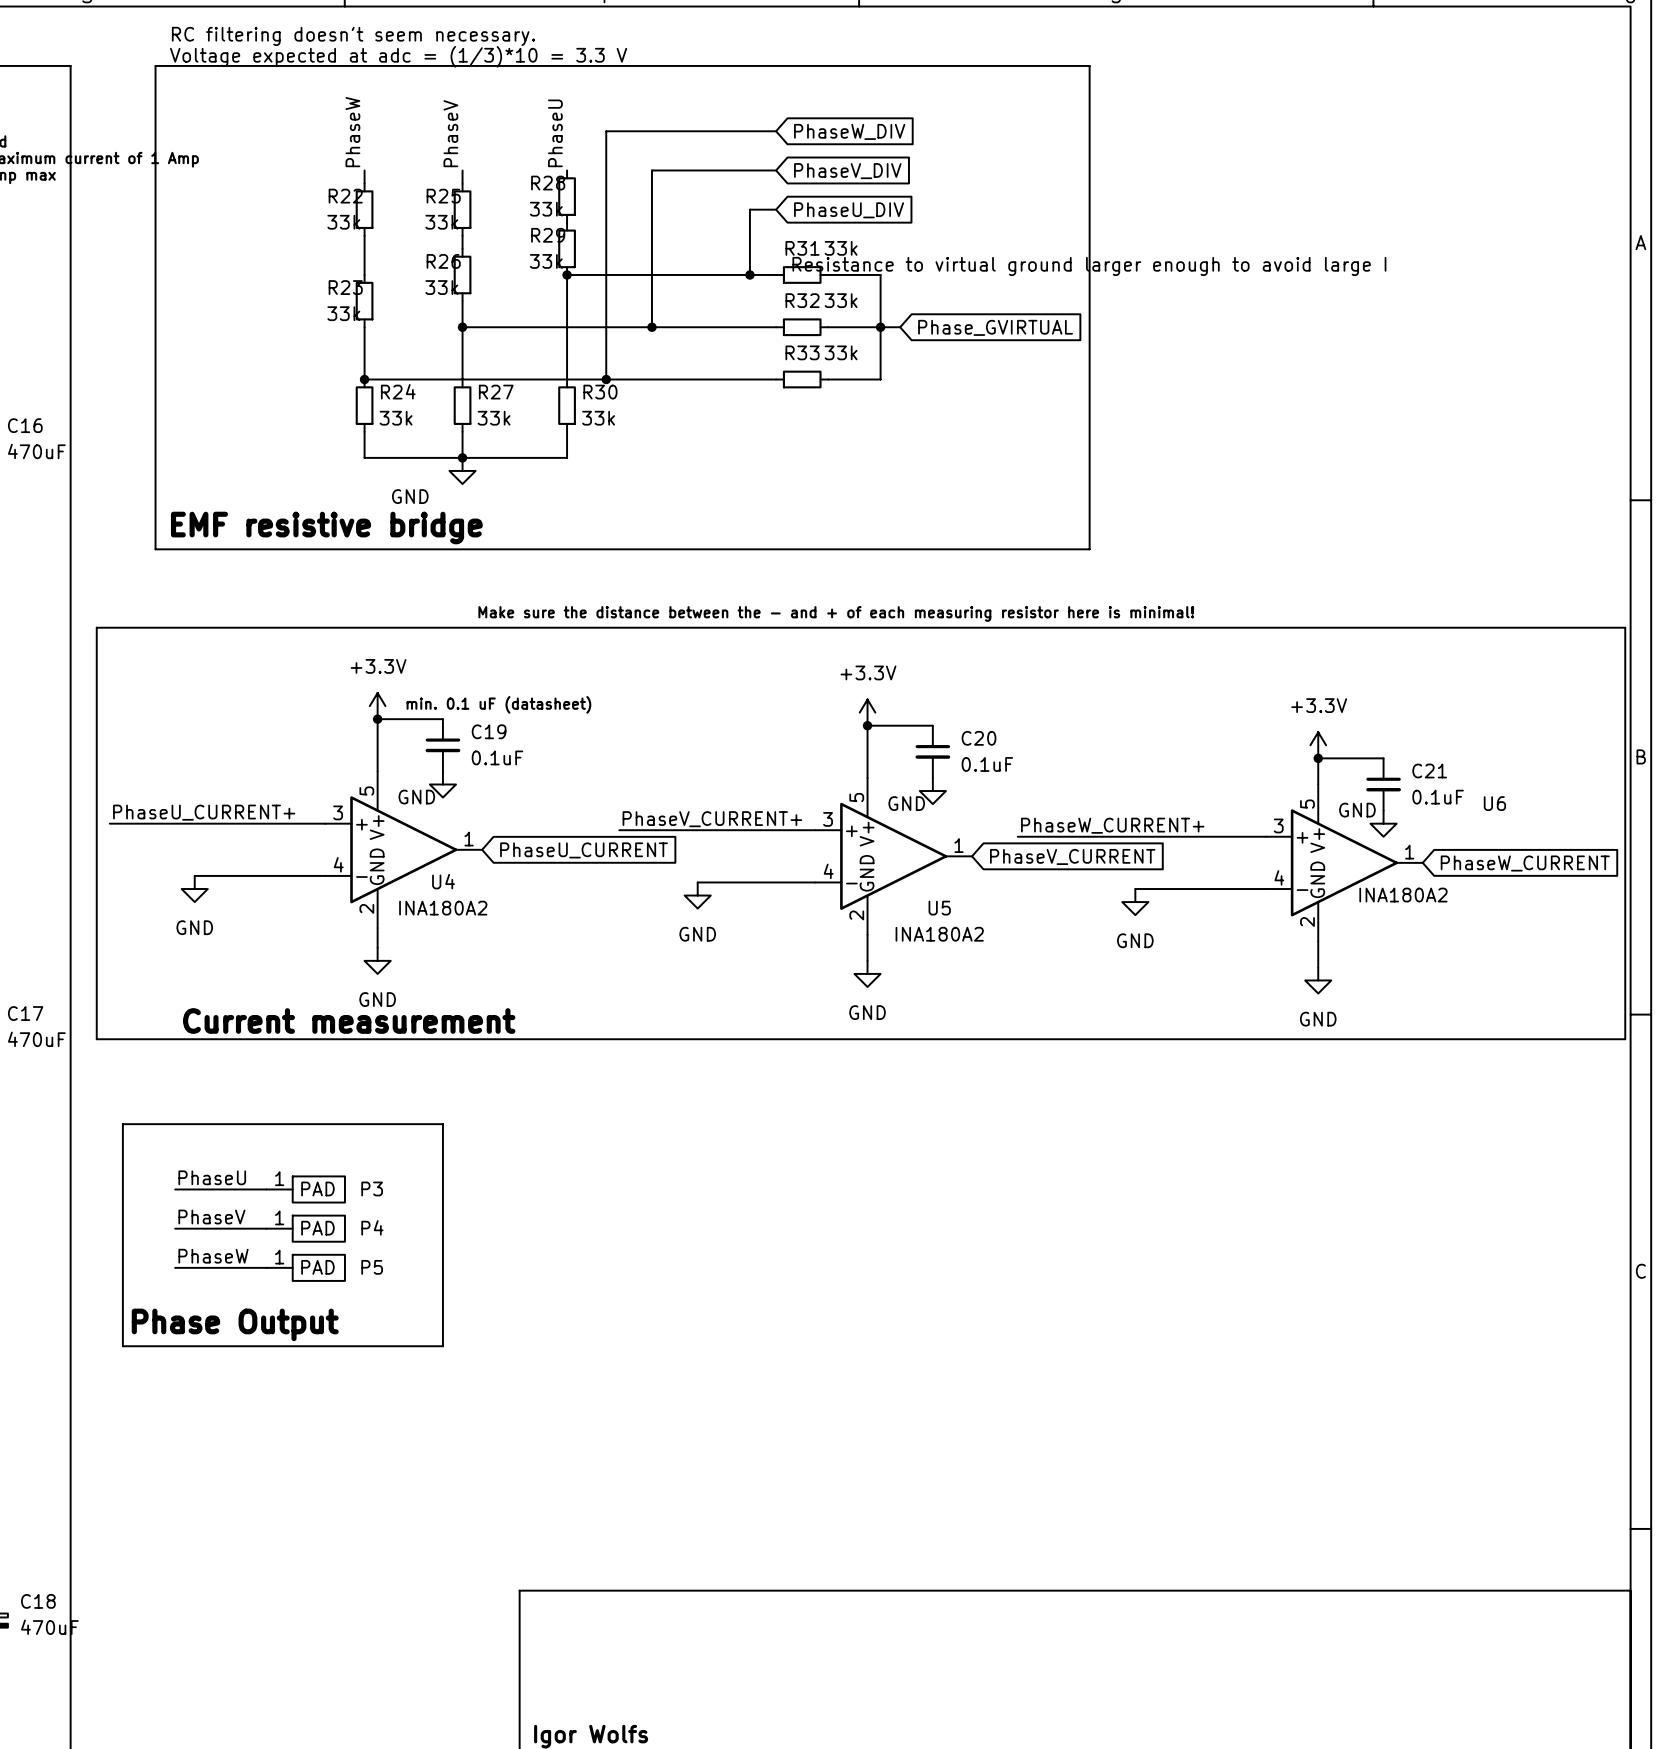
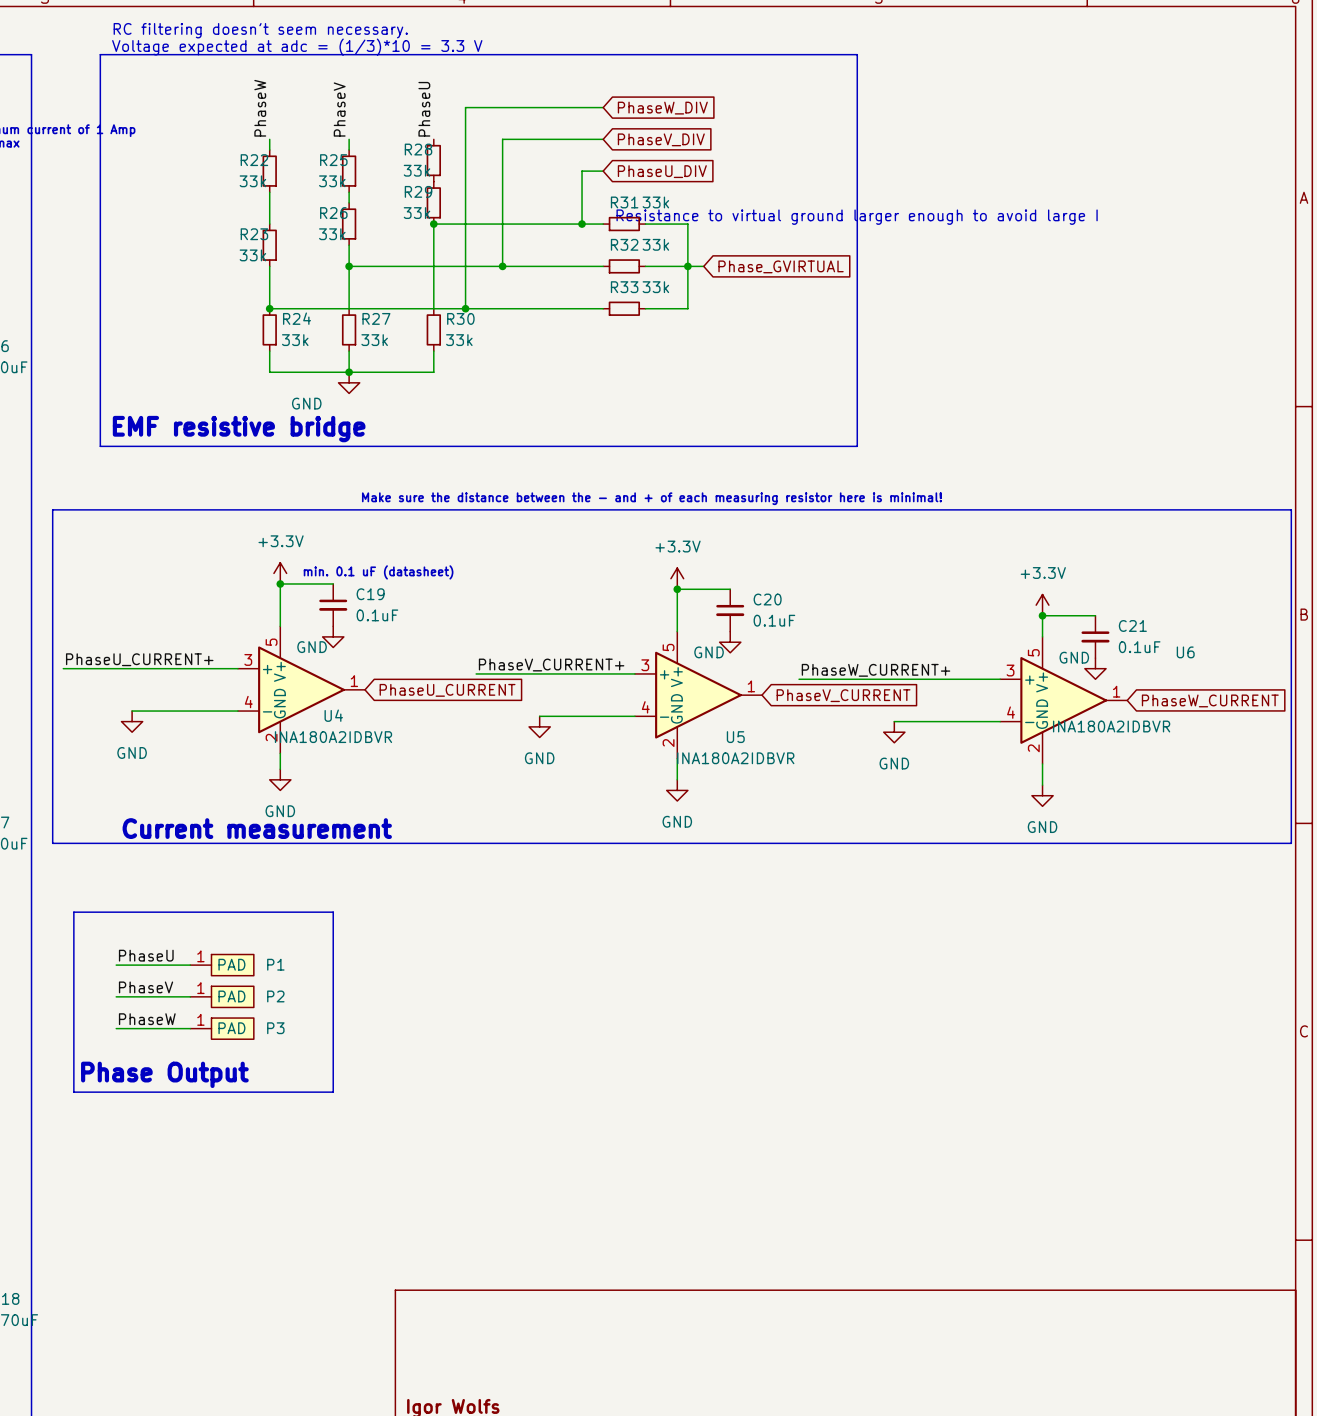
U6 value: INA180A2 (1403, 895) -> INA180A2IDBVR (1111, 726)
U4 value: INA180A2 (443, 908) -> INA180A2IDBVR (333, 737)
U5 value: INA180A2 (939, 934) -> INA180A2IDBVR (735, 758)
P3 name: P3 (372, 1188) -> P1 (275, 964)
P4 name: P4 (372, 1227) -> P2 (275, 996)
P5 name: P5 (372, 1267) -> P3 (275, 1028)

